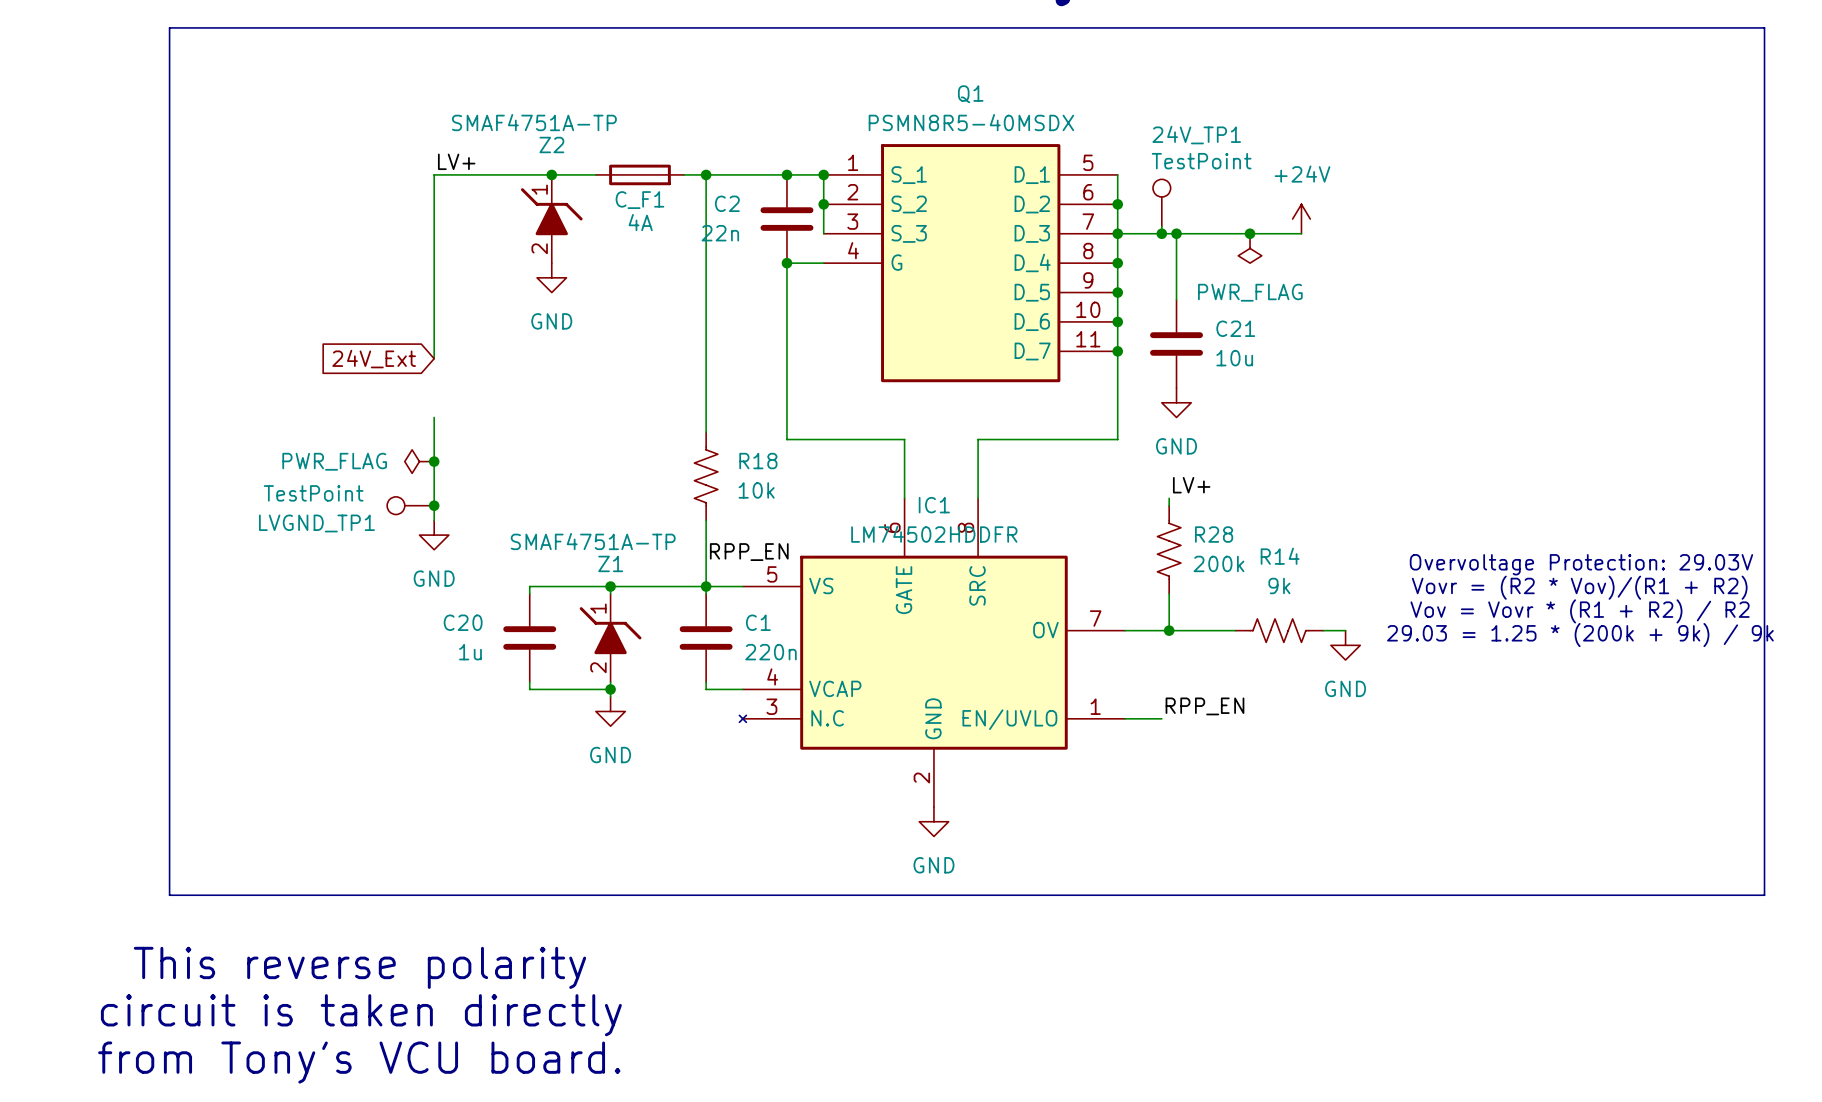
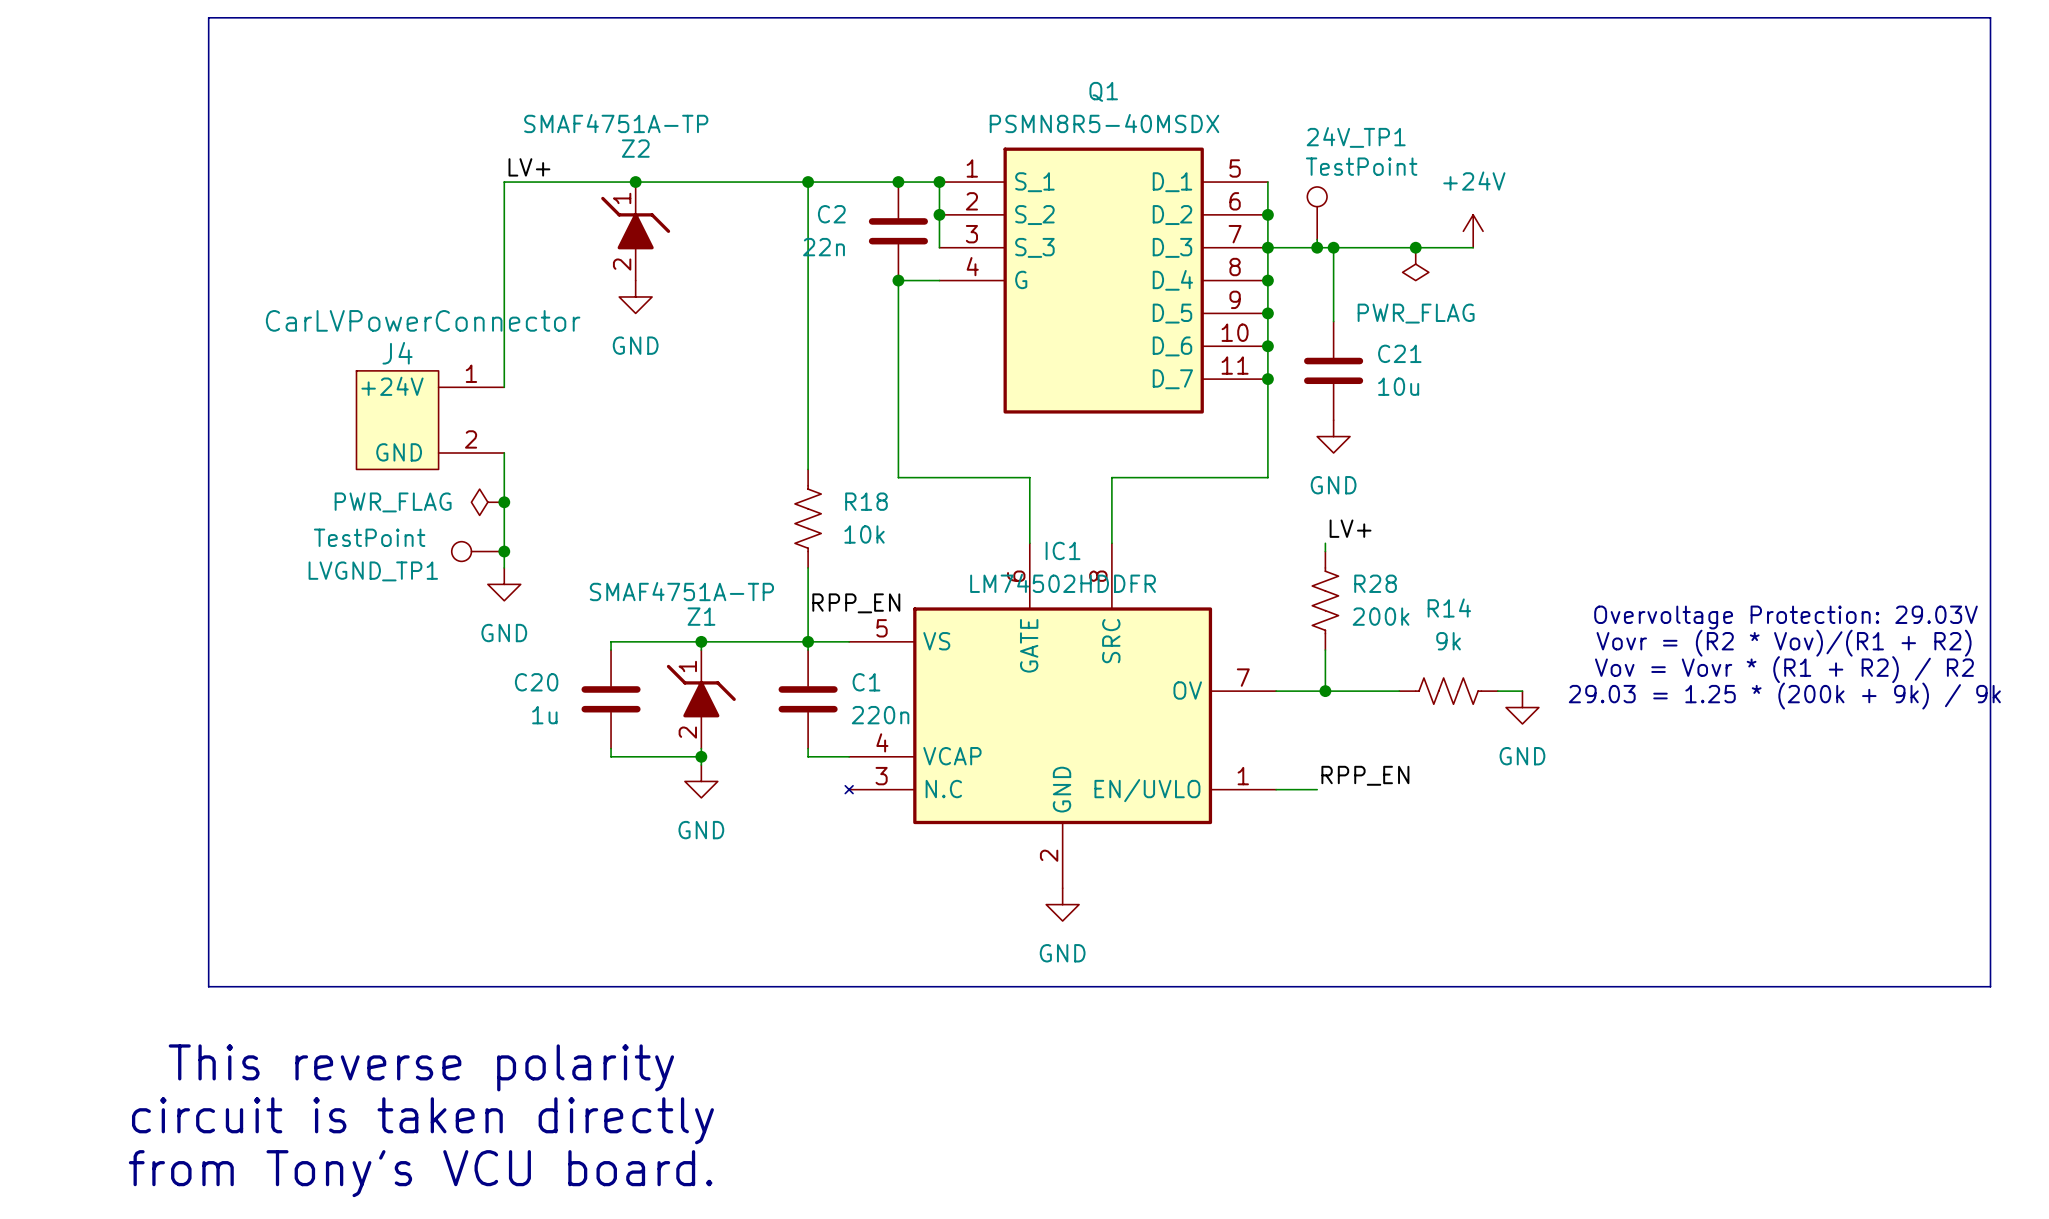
C_F1: 4A (639, 174) -> none
global label: 24V_Ext (374, 359) -> none
J4: none -> CarLVPowerConnector (430, 420)

